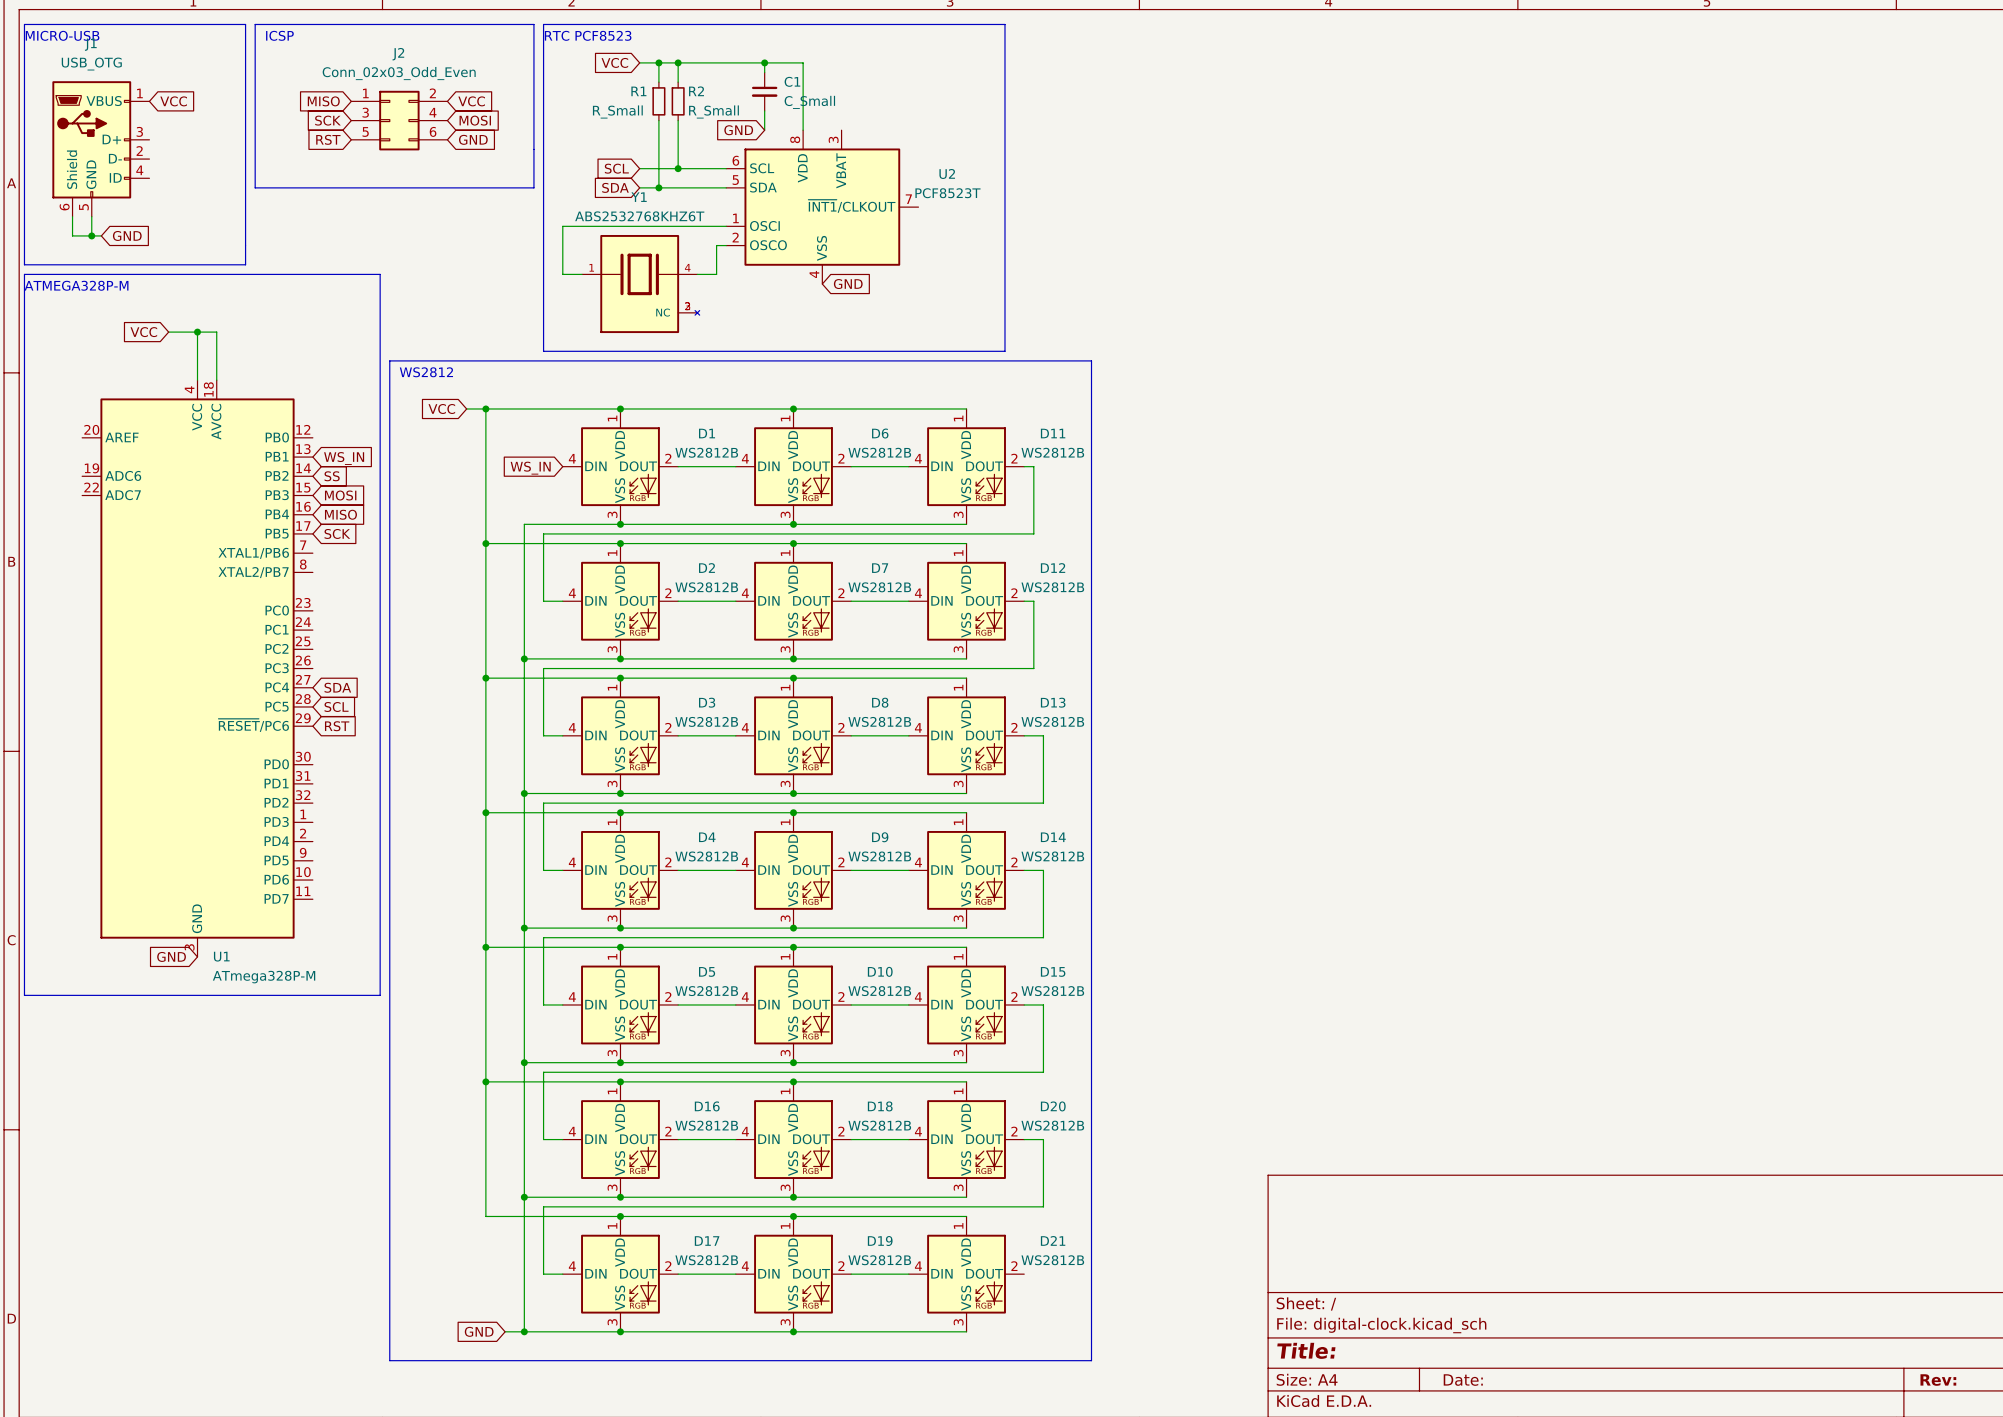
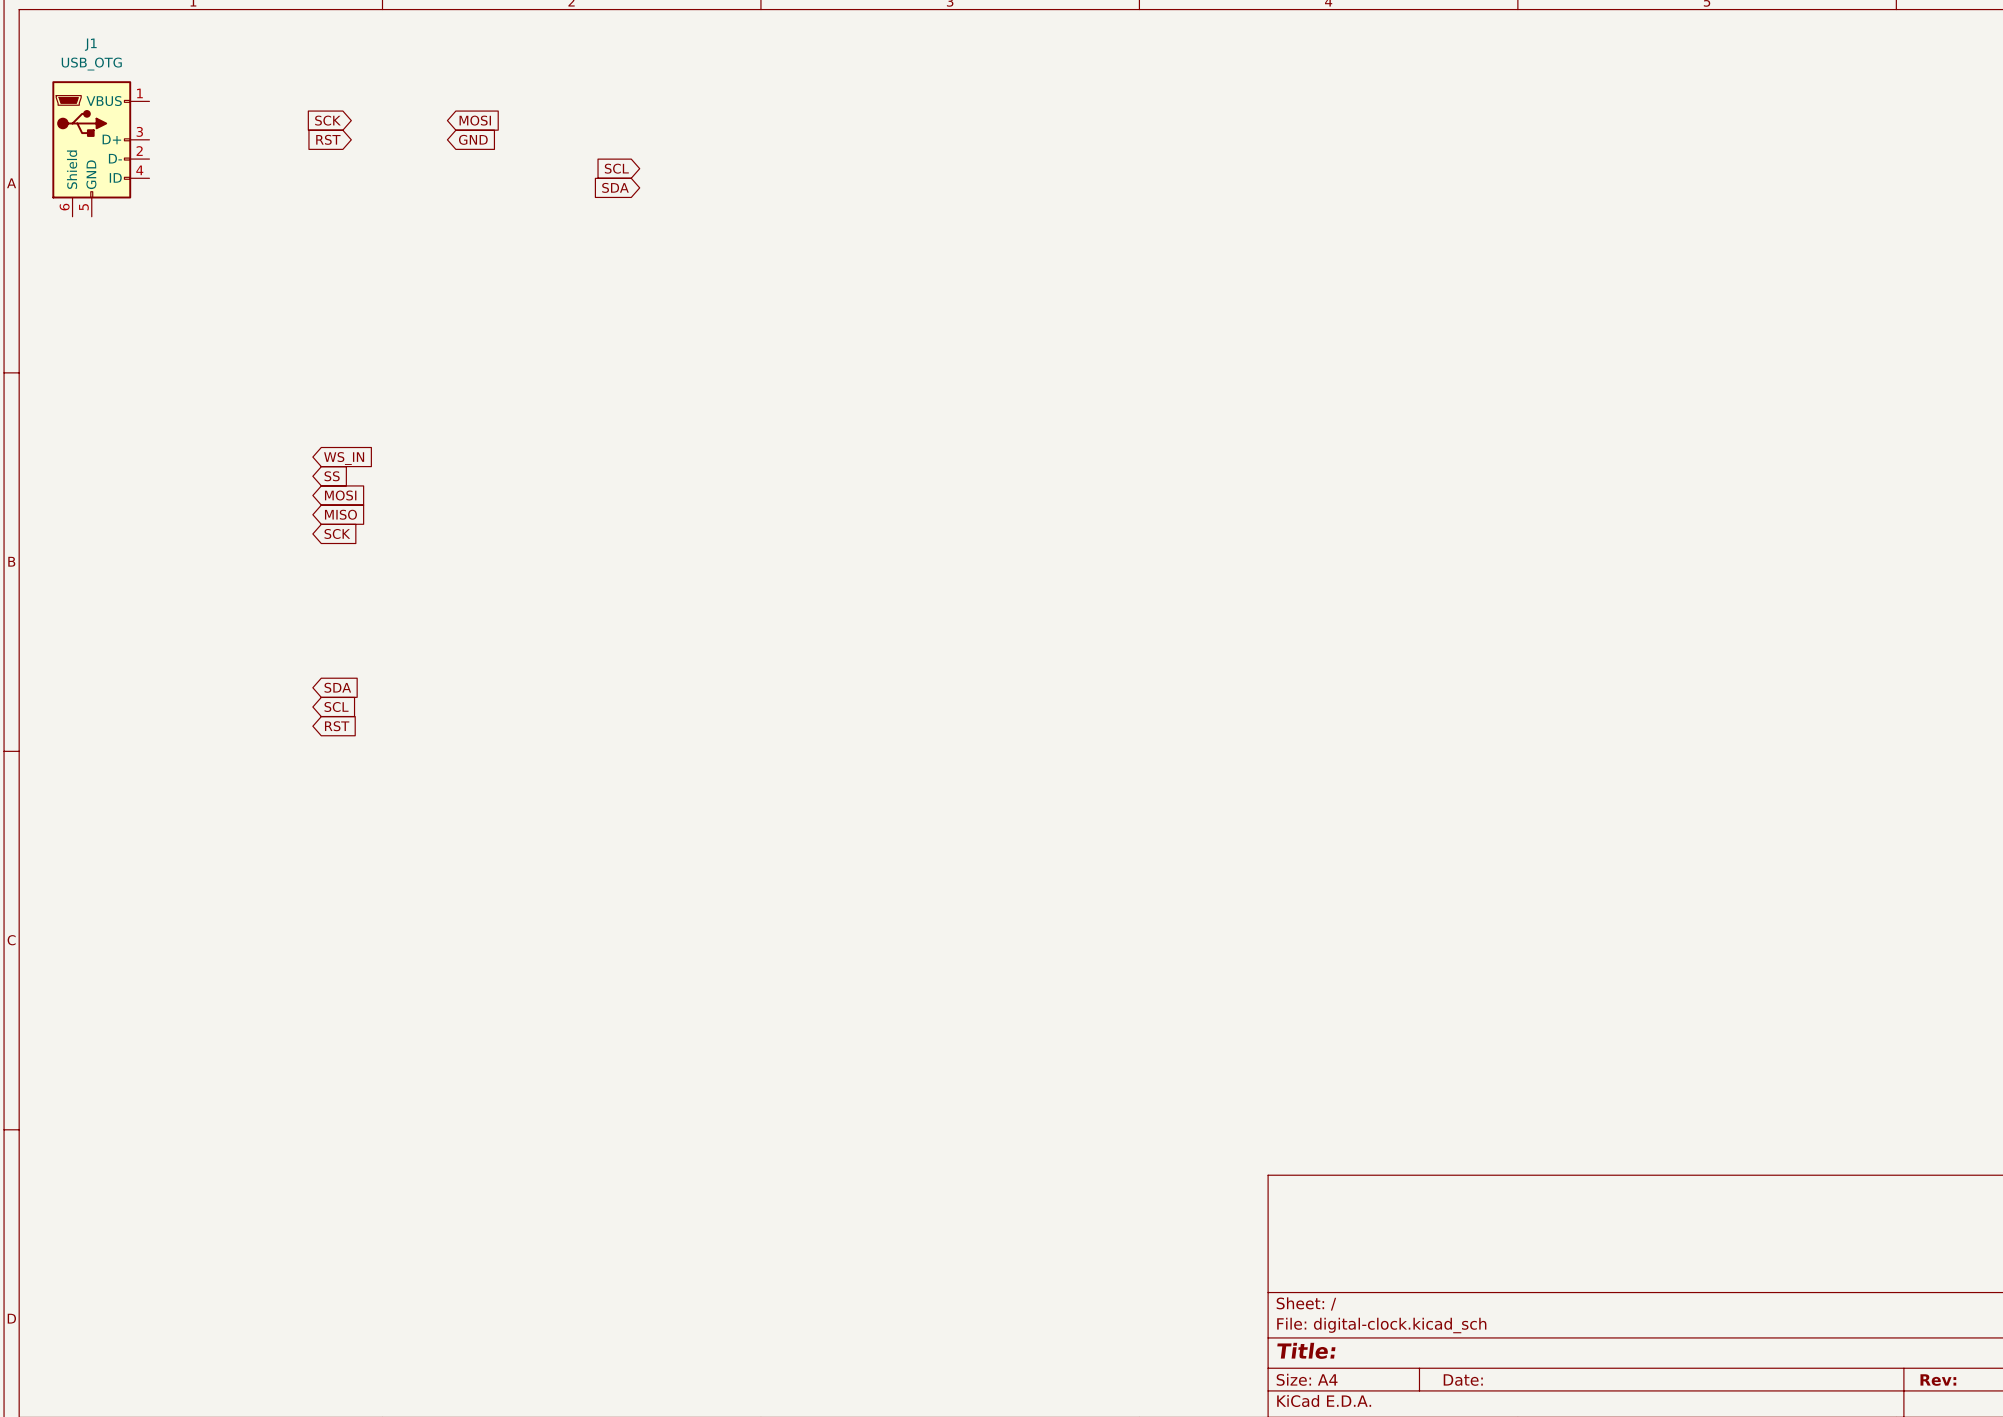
line: (24, 24) (24, 264) (245, 264) (245, 24) (24, 24) -> none
line: (255, 24) (255, 187) (533, 187) (533, 24) (255, 24) -> none
line: (543, 24) (1004, 24) (1004, 351) (543, 351) (543, 24) -> none
text: MICRO-USB (62, 35) -> none
text: ICSP (279, 35) -> none
text: RTC PCF8523 (588, 35) -> none
global label: VCC (614, 62) -> none
wire: (639, 62) (803, 62) (803, 130) -> none
wire: (658, 62) (658, 82) -> none
junction: (658, 62) -> none
wire: (678, 62) (678, 82) -> none
junction: (678, 62) -> none
wire: (764, 62) (764, 72) -> none
junction: (764, 62) -> none
C1: C_Small (764, 91) -> none
global label: VCC (173, 101) -> none
global label: MISO (323, 101) -> none
global label: VCC (471, 101) -> none
R1: R_Small (658, 101) -> none
R2: R_Small (678, 101) -> none
wire: (764, 110) (764, 130) -> none
J2: Conn_02x03_Odd_Even (399, 120) -> none
wire: (658, 120) (658, 187) -> none
wire: (678, 120) (678, 168) -> none
global label: GND (738, 130) -> none
wire: (639, 168) (726, 168) -> none
junction: (678, 168) -> none
wire: (639, 187) (726, 187) -> none
junction: (658, 187) -> none
U2: PCF8523T (822, 207) -> none
wire: (72, 216) (72, 235) (101, 235) -> none
wire: (91, 216) (91, 235) -> none
wire: (726, 226) (562, 226) (562, 274) (582, 274) -> none
junction: (91, 235) -> none
global label: GND (127, 235) -> none
wire: (726, 245) (716, 245) (716, 274) (697, 274) -> none
line: (24, 274) (24, 995) (380, 995) (380, 274) (24, 274) -> none
Y1: ABS2532768KHZ6T (640, 284) -> none
global label: GND (848, 284) -> none
text: ATMEGA328P-M (76, 285) -> none
global label: VCC (143, 332) -> none
wire: (168, 332) (216, 332) (216, 380) -> none
wire: (197, 332) (197, 380) -> none
junction: (197, 332) -> none
line: (389, 360) (389, 1360) (1091, 1360) (1091, 360) (389, 360) -> none
text: WS2812 (426, 372) -> none
global label: VCC (441, 408) -> none
wire: (466, 408) (966, 408) -> none
wire: (485, 408) (485, 1216) (966, 1216) -> none
junction: (485, 408) -> none
junction: (620, 408) -> none
junction: (793, 408) -> none
D1: WS2812B (620, 466) -> none
wire: (678, 466) (735, 466) -> none
D6: WS2812B (793, 466) -> none
wire: (851, 466) (908, 466) -> none
D11: WS2812B (966, 466) -> none
wire: (1024, 466) (1033, 466) (1033, 533) (543, 533) (543, 601) (562, 601) -> none
global label: WS_IN (530, 468) -> none
junction: (620, 524) -> none
junction: (793, 524) -> none
wire: (966, 524) (524, 524) (524, 1331) -> none
wire: (485, 543) (966, 543) -> none
junction: (485, 543) -> none
junction: (620, 543) -> none
junction: (793, 543) -> none
D2: WS2812B (620, 601) -> none
wire: (678, 601) (735, 601) -> none
D7: WS2812B (793, 601) -> none
wire: (851, 601) (908, 601) -> none
D12: WS2812B (966, 601) -> none
wire: (1024, 601) (1033, 601) (1033, 668) (543, 668) (543, 735) (562, 735) -> none
wire: (524, 658) (966, 658) -> none
junction: (524, 658) -> none
junction: (620, 658) -> none
junction: (793, 658) -> none
U1: ATmega328P-M (197, 668) -> none
wire: (485, 678) (966, 678) -> none
junction: (485, 678) -> none
junction: (620, 678) -> none
junction: (793, 678) -> none
D3: WS2812B (620, 735) -> none
wire: (678, 735) (735, 735) -> none
D8: WS2812B (793, 735) -> none
wire: (851, 735) (908, 735) -> none
D13: WS2812B (966, 735) -> none
wire: (1024, 735) (1043, 735) (1043, 803) (543, 803) (543, 870) (562, 870) -> none
wire: (524, 793) (966, 793) -> none
junction: (524, 793) -> none
junction: (620, 793) -> none
junction: (793, 793) -> none
wire: (485, 812) (966, 812) -> none
junction: (485, 812) -> none
junction: (620, 812) -> none
junction: (793, 812) -> none
D4: WS2812B (620, 870) -> none
wire: (678, 870) (735, 870) -> none
D9: WS2812B (793, 870) -> none
wire: (851, 870) (908, 870) -> none
D14: WS2812B (966, 870) -> none
wire: (1024, 870) (1043, 870) (1043, 937) (543, 937) (543, 1004) (562, 1004) -> none
wire: (524, 928) (966, 928) -> none
junction: (524, 928) -> none
junction: (620, 928) -> none
junction: (793, 928) -> none
wire: (485, 947) (966, 947) -> none
junction: (485, 947) -> none
junction: (620, 947) -> none
junction: (793, 947) -> none
global label: GND (171, 956) -> none
D5: WS2812B (620, 1004) -> none
wire: (678, 1004) (735, 1004) -> none
D10: WS2812B (793, 1004) -> none
wire: (851, 1004) (908, 1004) -> none
D15: WS2812B (966, 1004) -> none
wire: (1024, 1004) (1043, 1004) (1043, 1072) (543, 1072) (543, 1139) (562, 1139) -> none
wire: (524, 1062) (966, 1062) -> none
junction: (524, 1062) -> none
junction: (620, 1062) -> none
junction: (793, 1062) -> none
wire: (485, 1081) (966, 1081) -> none
junction: (485, 1081) -> none
junction: (620, 1081) -> none
junction: (793, 1081) -> none
D16: WS2812B (620, 1139) -> none
wire: (678, 1139) (735, 1139) -> none
D18: WS2812B (793, 1139) -> none
wire: (851, 1139) (908, 1139) -> none
D20: WS2812B (966, 1139) -> none
wire: (1024, 1139) (1043, 1139) (1043, 1206) (543, 1206) (543, 1274) (562, 1274) -> none
wire: (524, 1197) (966, 1197) -> none
junction: (524, 1197) -> none
junction: (620, 1197) -> none
junction: (793, 1197) -> none
junction: (620, 1216) -> none
junction: (793, 1216) -> none
D17: WS2812B (620, 1274) -> none
wire: (678, 1274) (735, 1274) -> none
D19: WS2812B (793, 1274) -> none
wire: (851, 1274) (908, 1274) -> none
D21: WS2812B (966, 1274) -> none
global label: GND (479, 1331) -> none
wire: (505, 1331) (966, 1331) -> none
junction: (524, 1331) -> none
junction: (620, 1331) -> none
junction: (793, 1331) -> none

